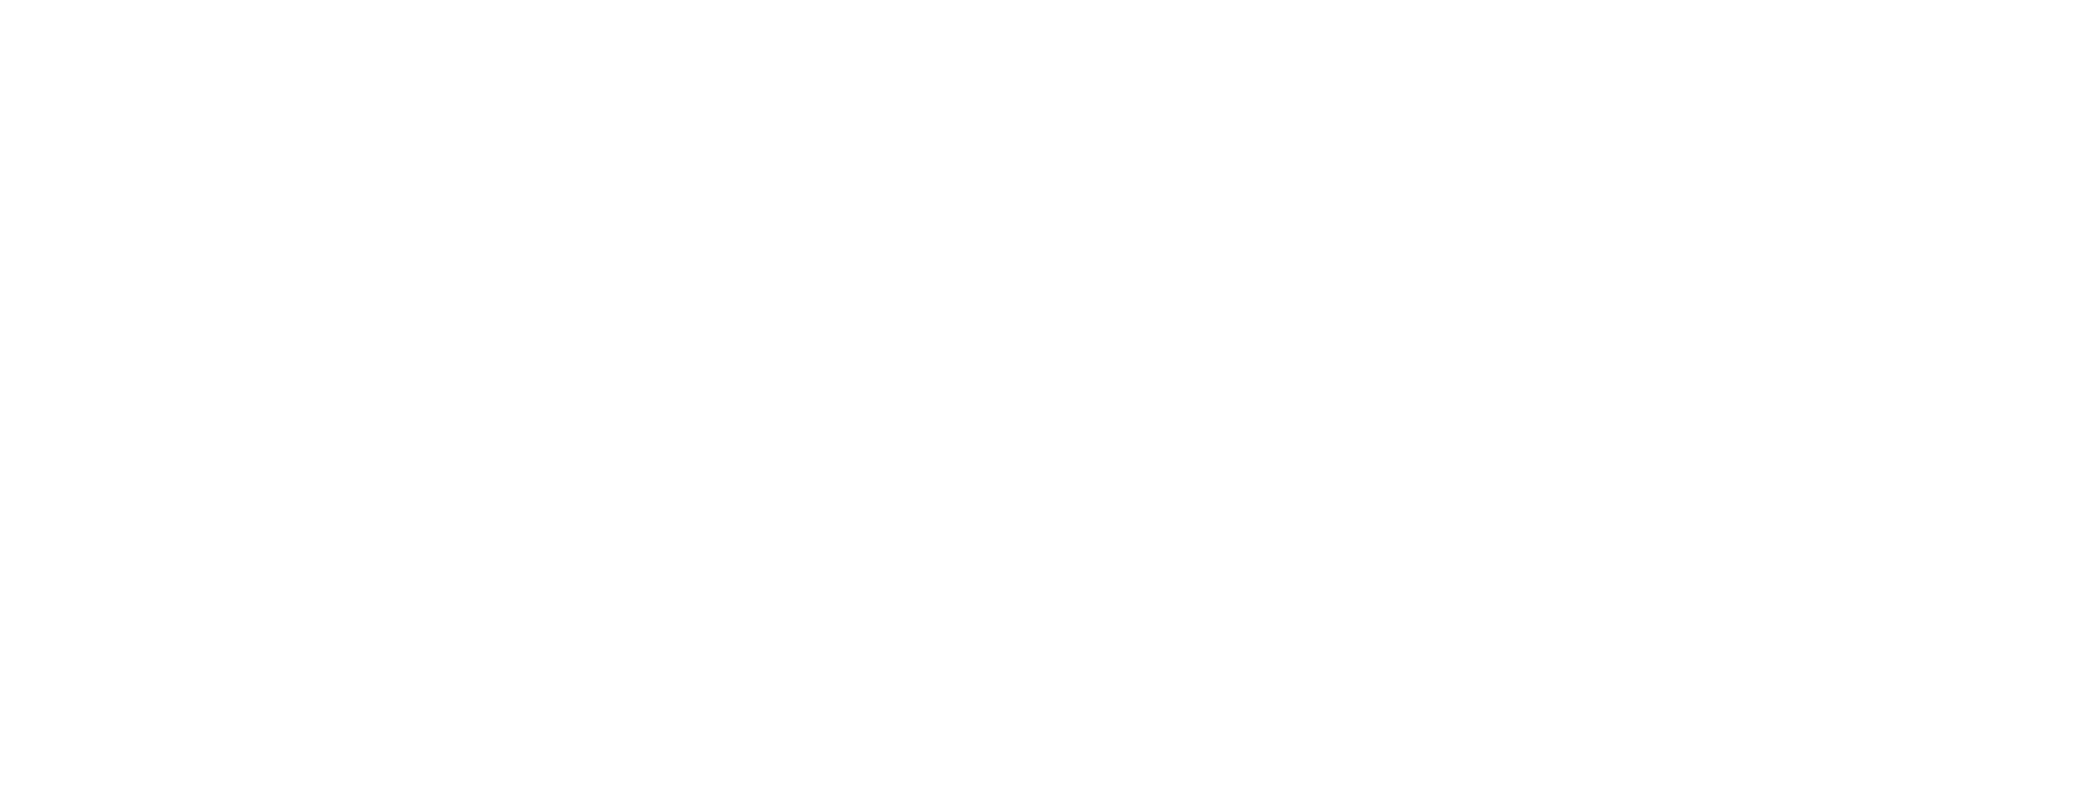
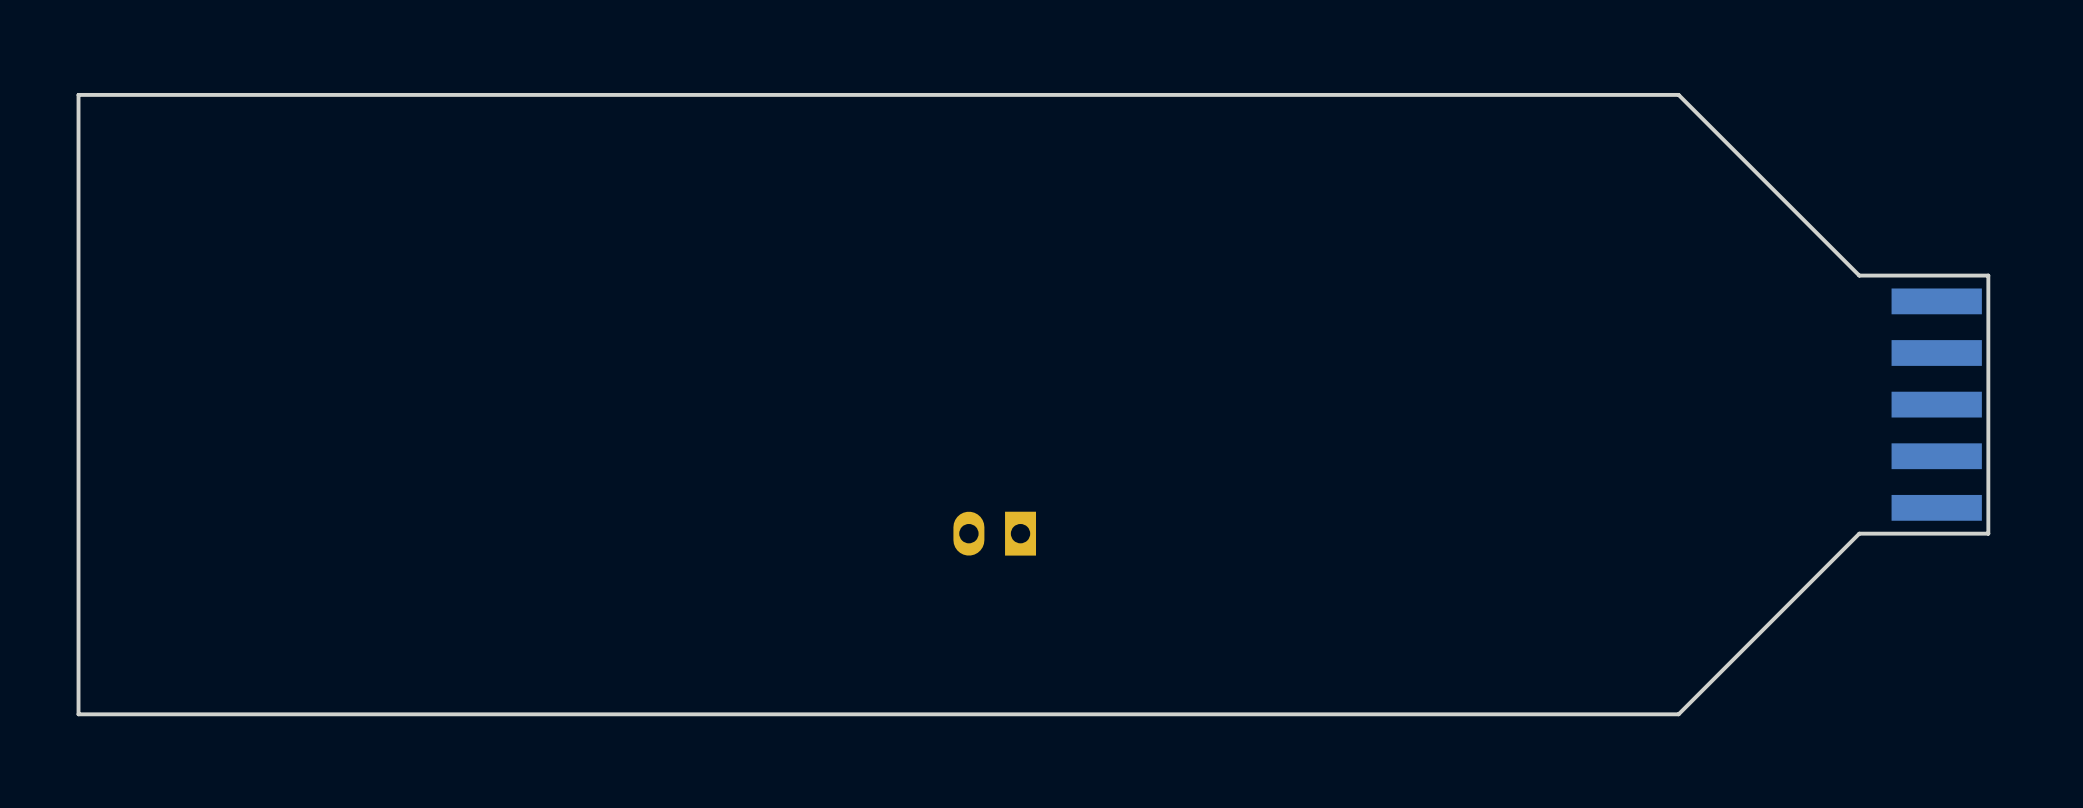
board edge: none -> (1678, 94) (1859, 275) (1988, 275) (1988, 533) (1859, 533) (1678, 714) (78, 714) (78, 94) (1678, 94)
part: none -> (1936, 404)
part: none -> (994, 533)

